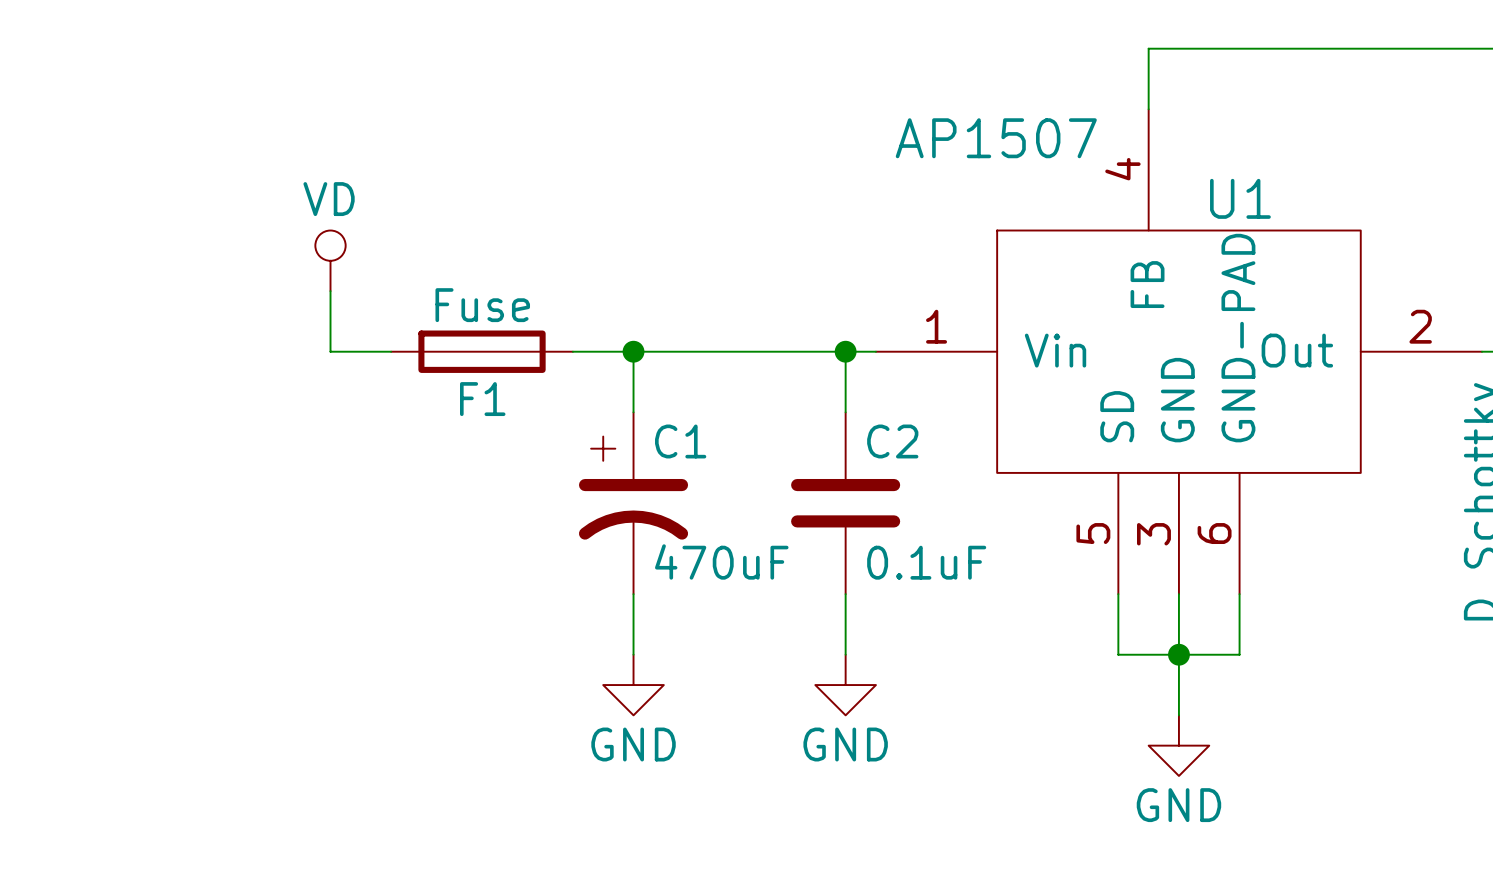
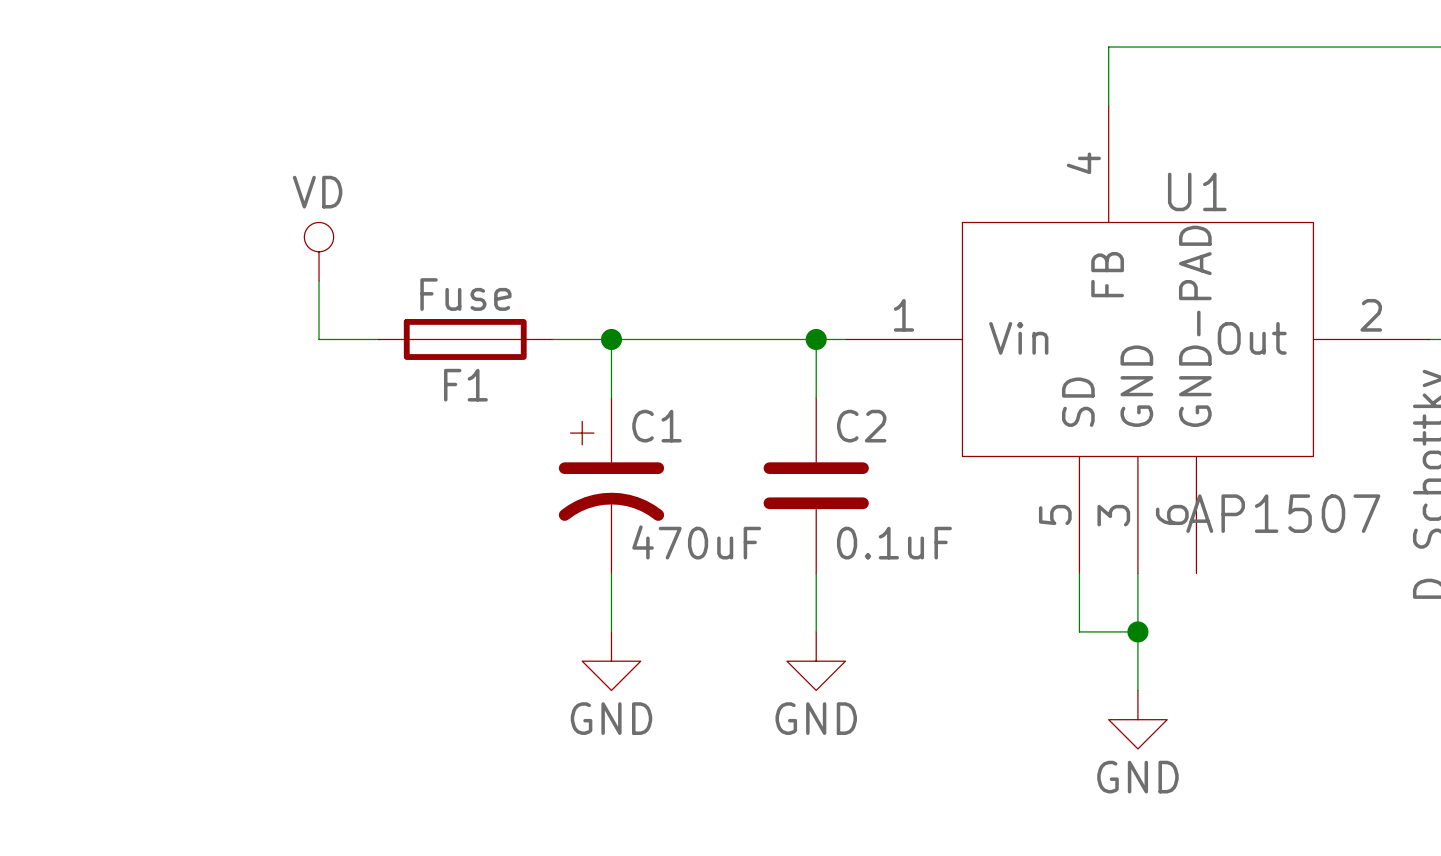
U1 value position: AP1507 (996, 138) -> AP1507 (1283, 513)
wire: (1239, 594) (1239, 654) (1178, 654) -> none

